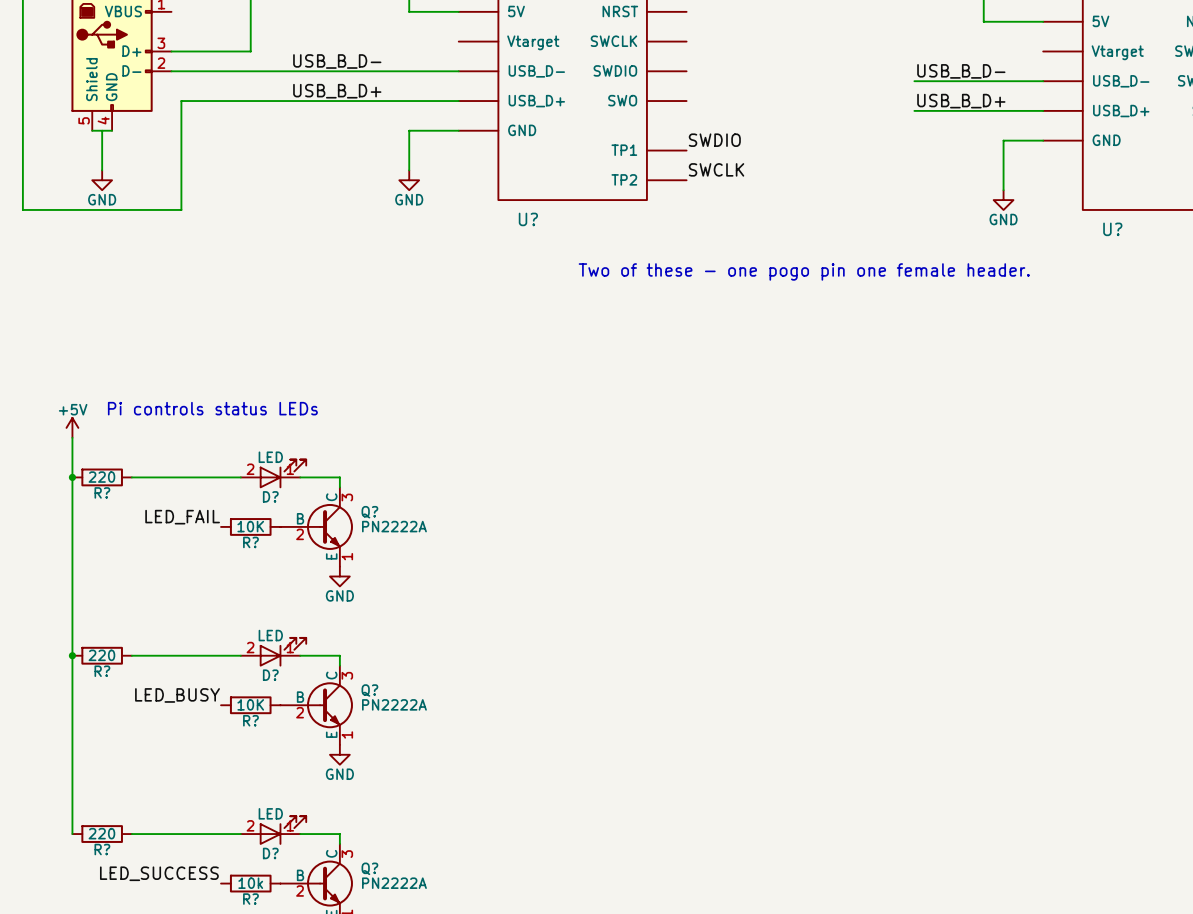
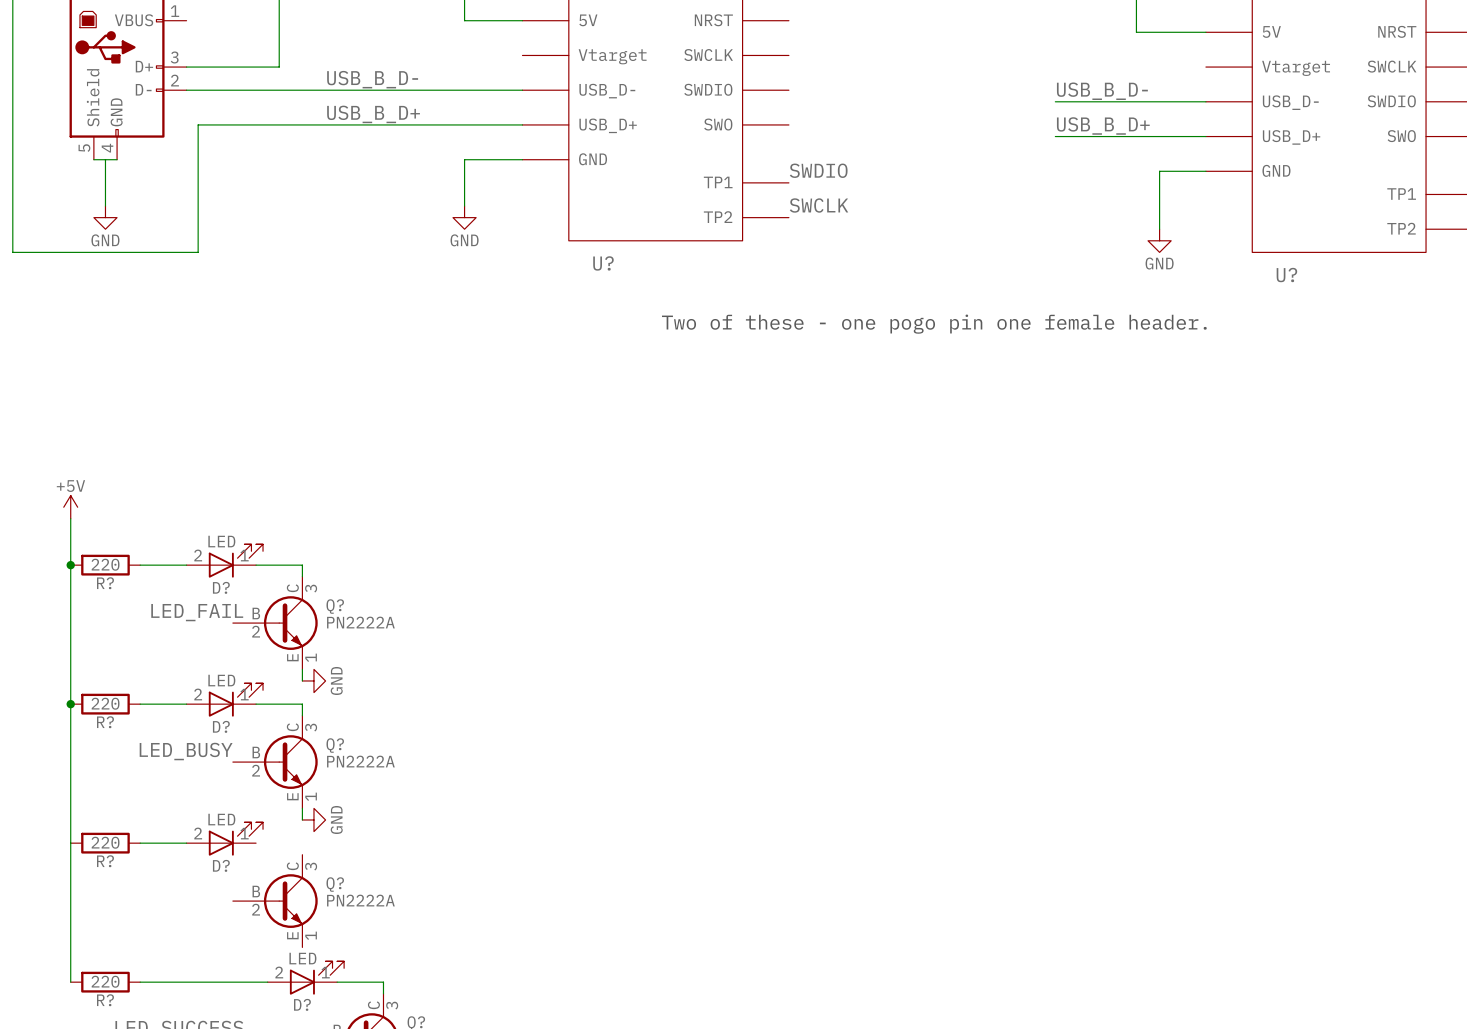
text: Pi controls status LEDs (212, 408) -> none
D?: none -> LED (224, 560)
D?: LED (273, 473) -> none
wire: (300, 477) (339, 477) (339, 487) -> none
Q?: none -> PN2222A (275, 623)
R?: 10K (250, 526) -> none
Q?: PN2222A (316, 526) -> none
wire: none -> (302, 669) (302, 680)
power symbol rotation: 0° (339, 576) -> 90° counterclockwise (313, 680)
power symbol position: GND (339, 576) -> GND (313, 680)
D?: none -> LED (224, 699)
junction: none -> (70, 704)
R?: none -> 220 (105, 704)
wire: none -> (140, 704) (186, 704)
Q?: none -> PN2222A (275, 762)
D?: LED (273, 652) -> none
junction: (72, 655) -> none
R?: 220 (102, 655) -> none
wire: (131, 655) (240, 655) -> none
wire: (300, 655) (339, 655) (339, 665) -> (256, 704) (302, 704) (302, 715)
wire: none -> (302, 808) (302, 819)
label position: LED_BUSY (177, 695) -> LED_BUSY (186, 751)
power symbol: none -> GND (313, 819)
R?: 10K (250, 705) -> none
Q?: PN2222A (316, 705) -> none
D?: none -> LED (224, 838)
R?: none -> 220 (105, 843)
wire: none -> (140, 843) (186, 843)
power symbol: GND (339, 754) -> none
Q?: none -> PN2222A (275, 901)

